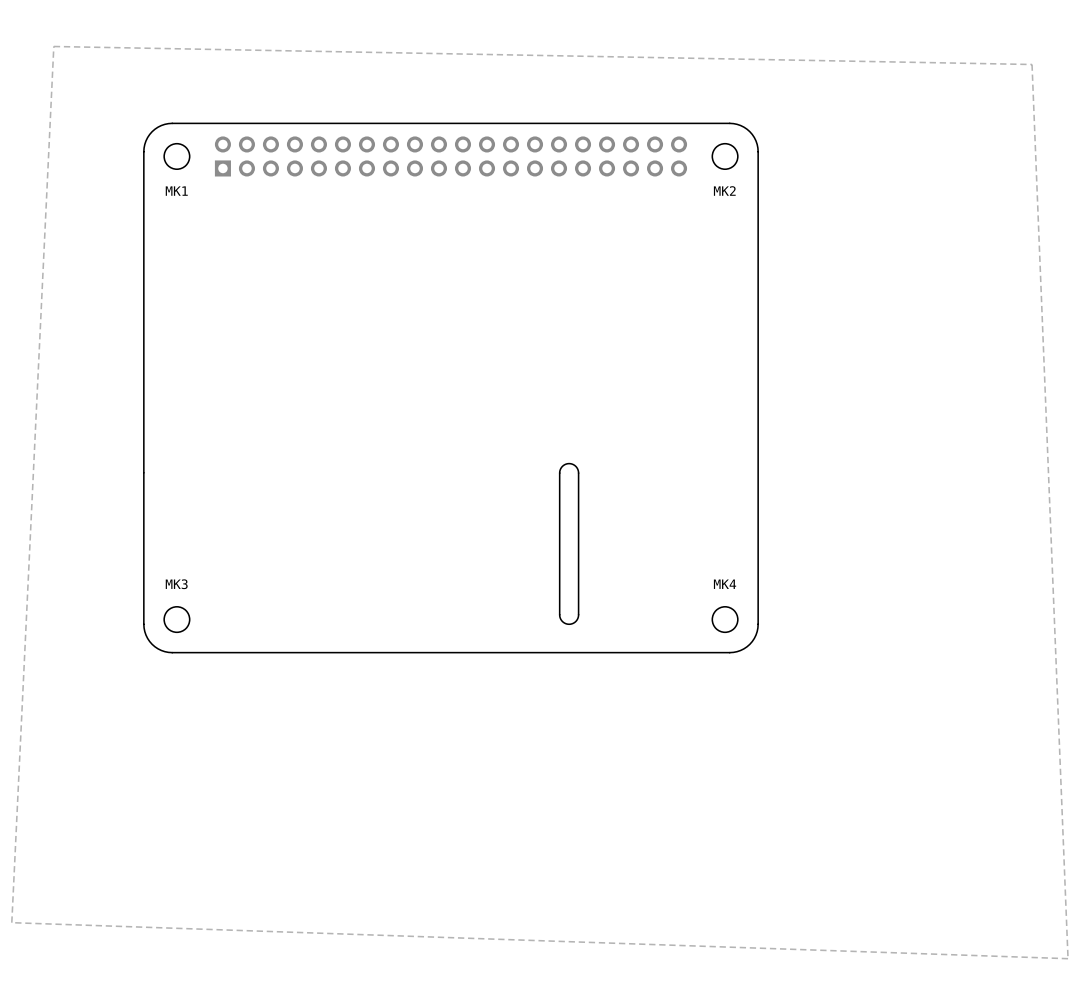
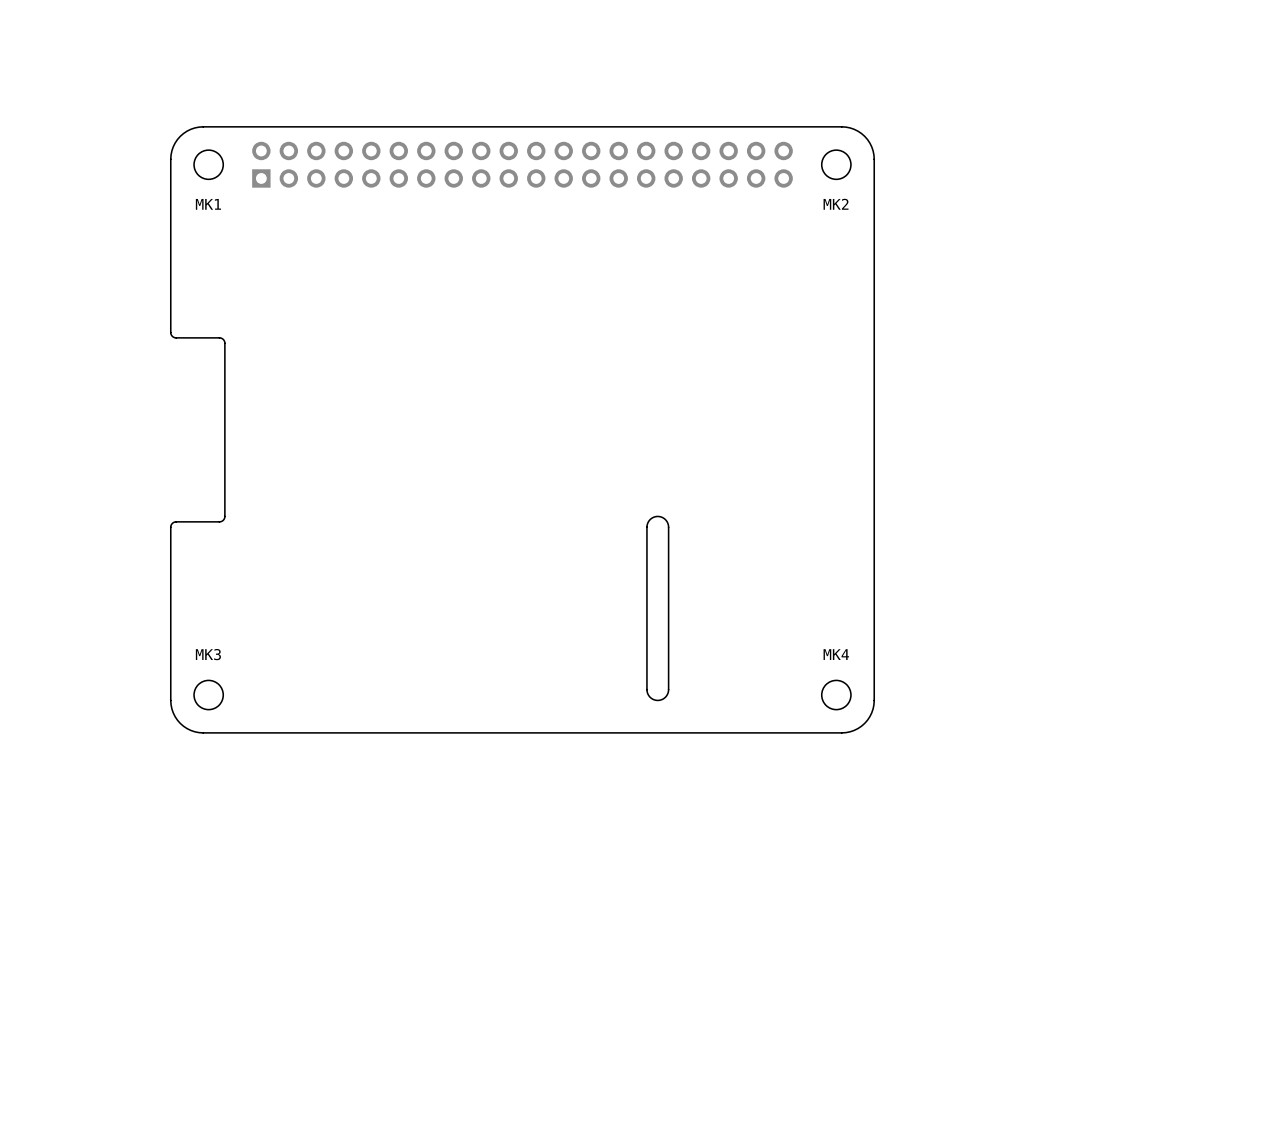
zone outline: (53, 46) (1032, 64) (1068, 958) (11, 922) (53, 46) -> none
board edge: (143, 302) (143, 472) -> (170, 332) (174, 337) (220, 337) (224, 343) (224, 517) (220, 521) (175, 521) (170, 527)

